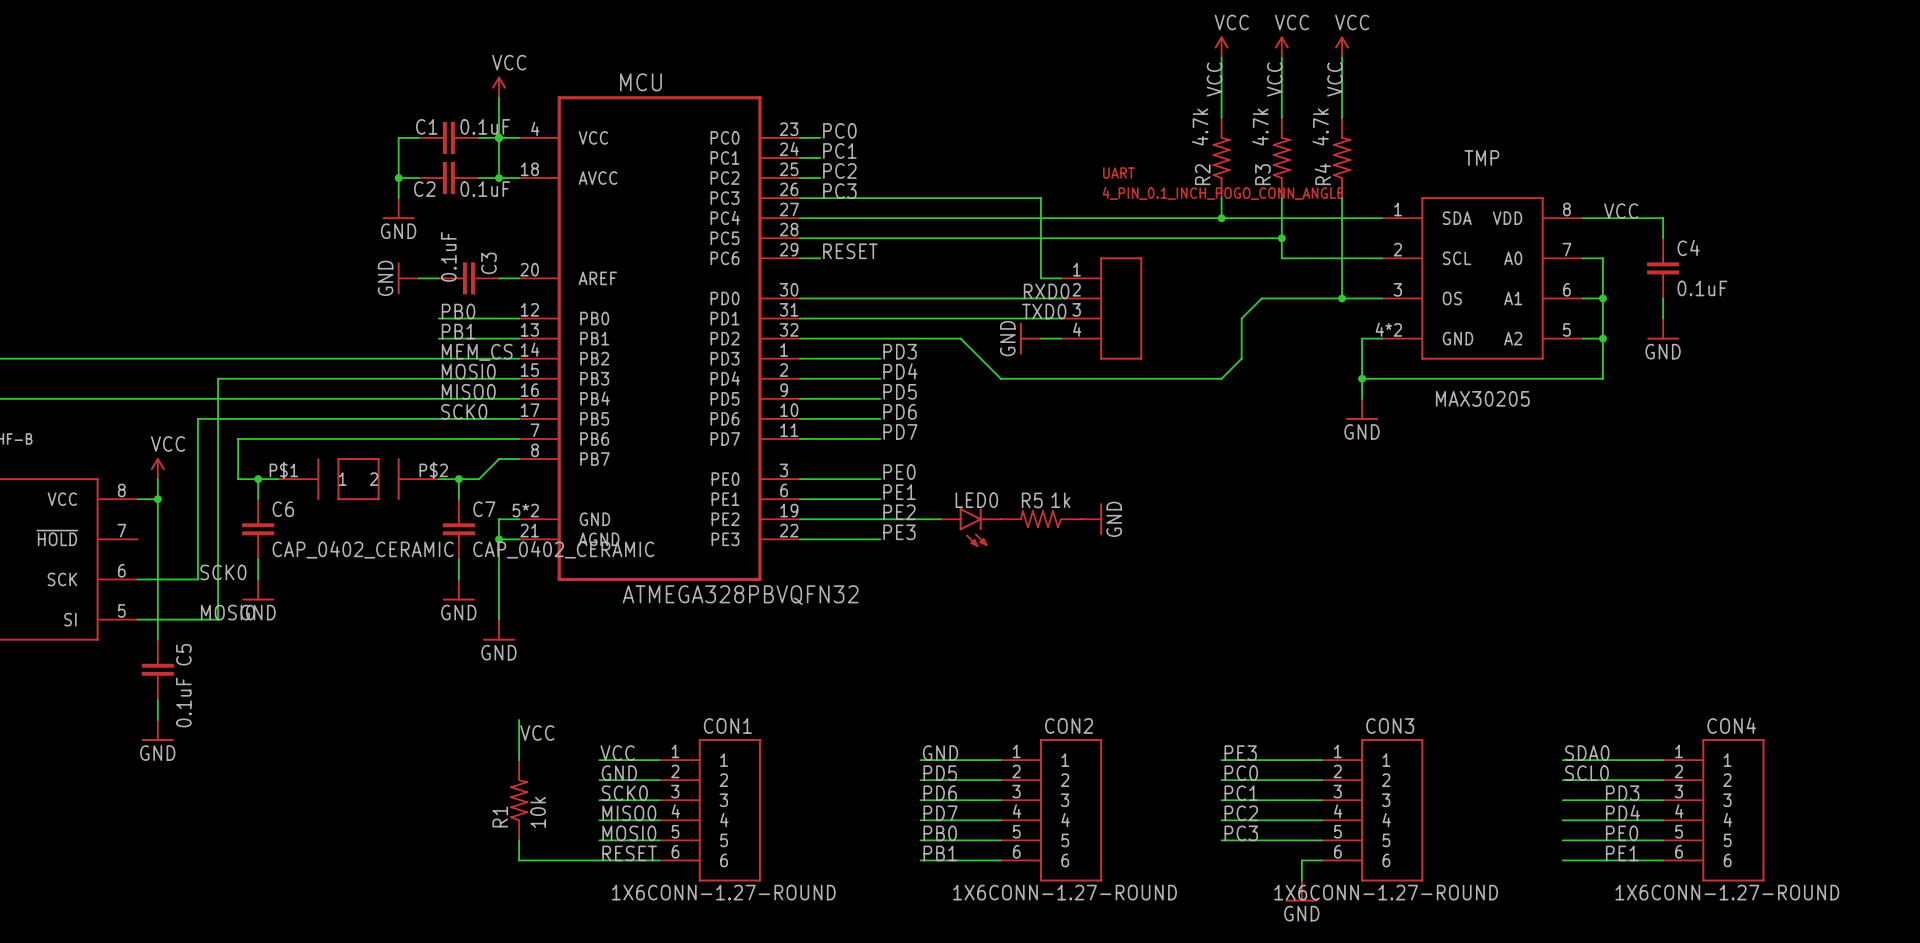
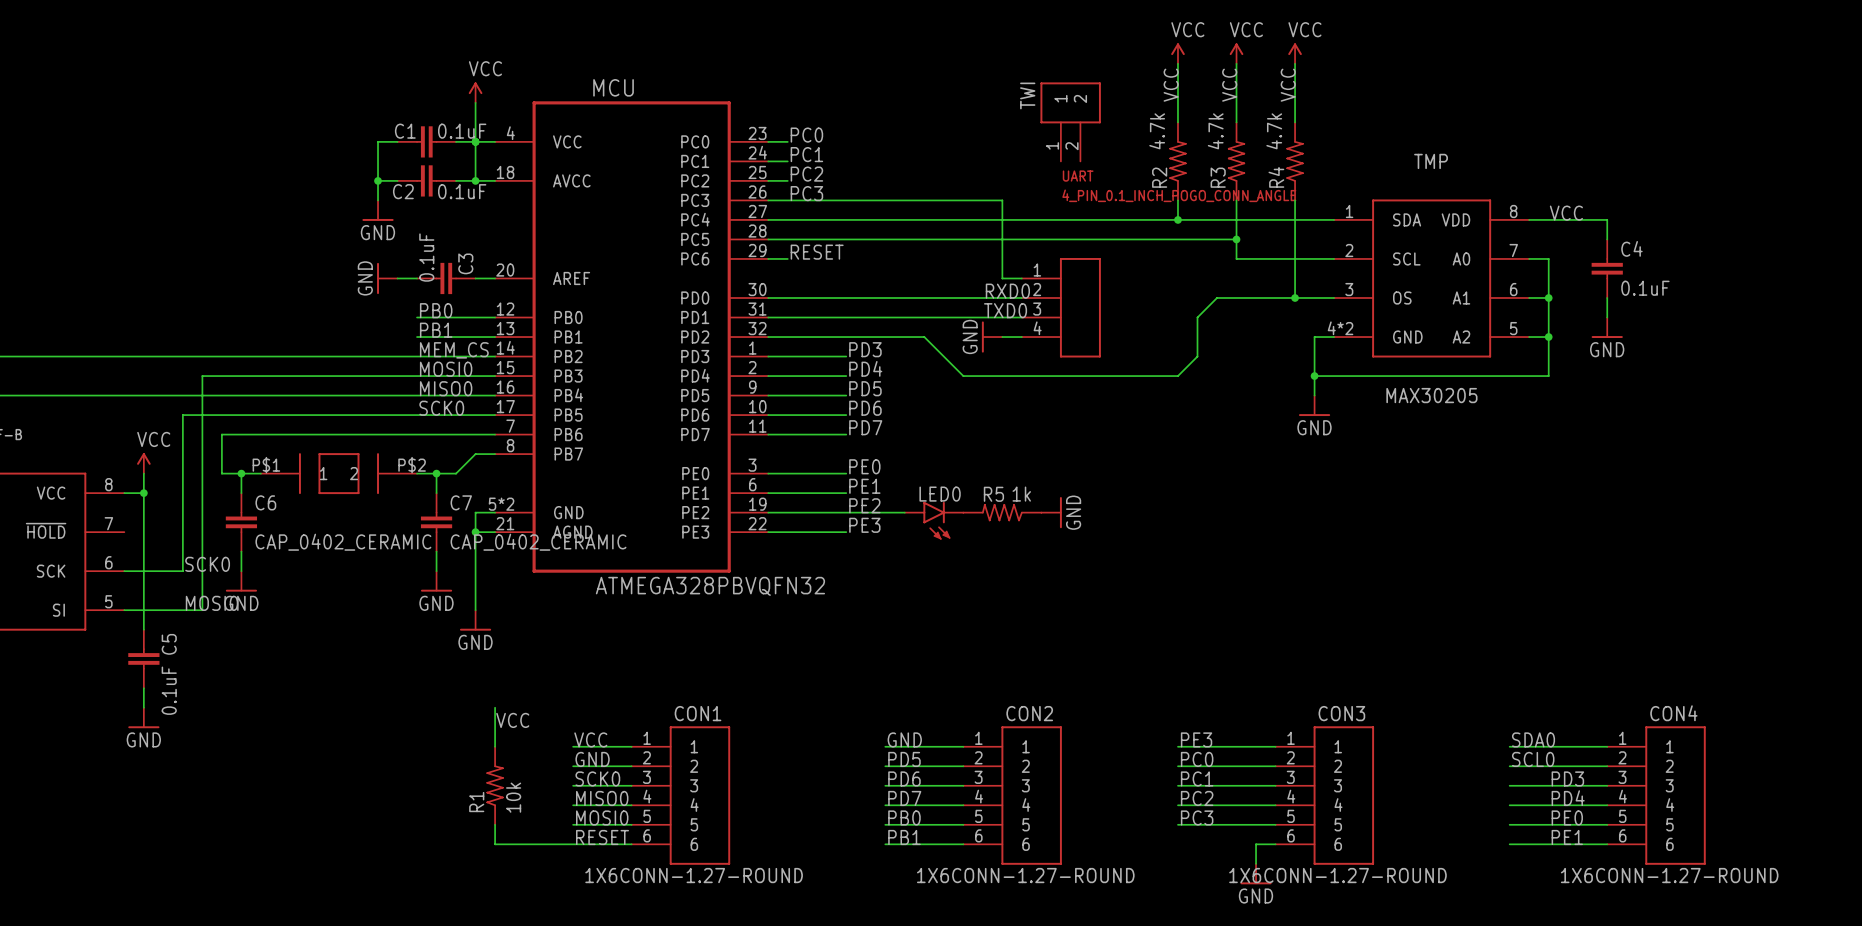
TWI: none -> (1070, 121)

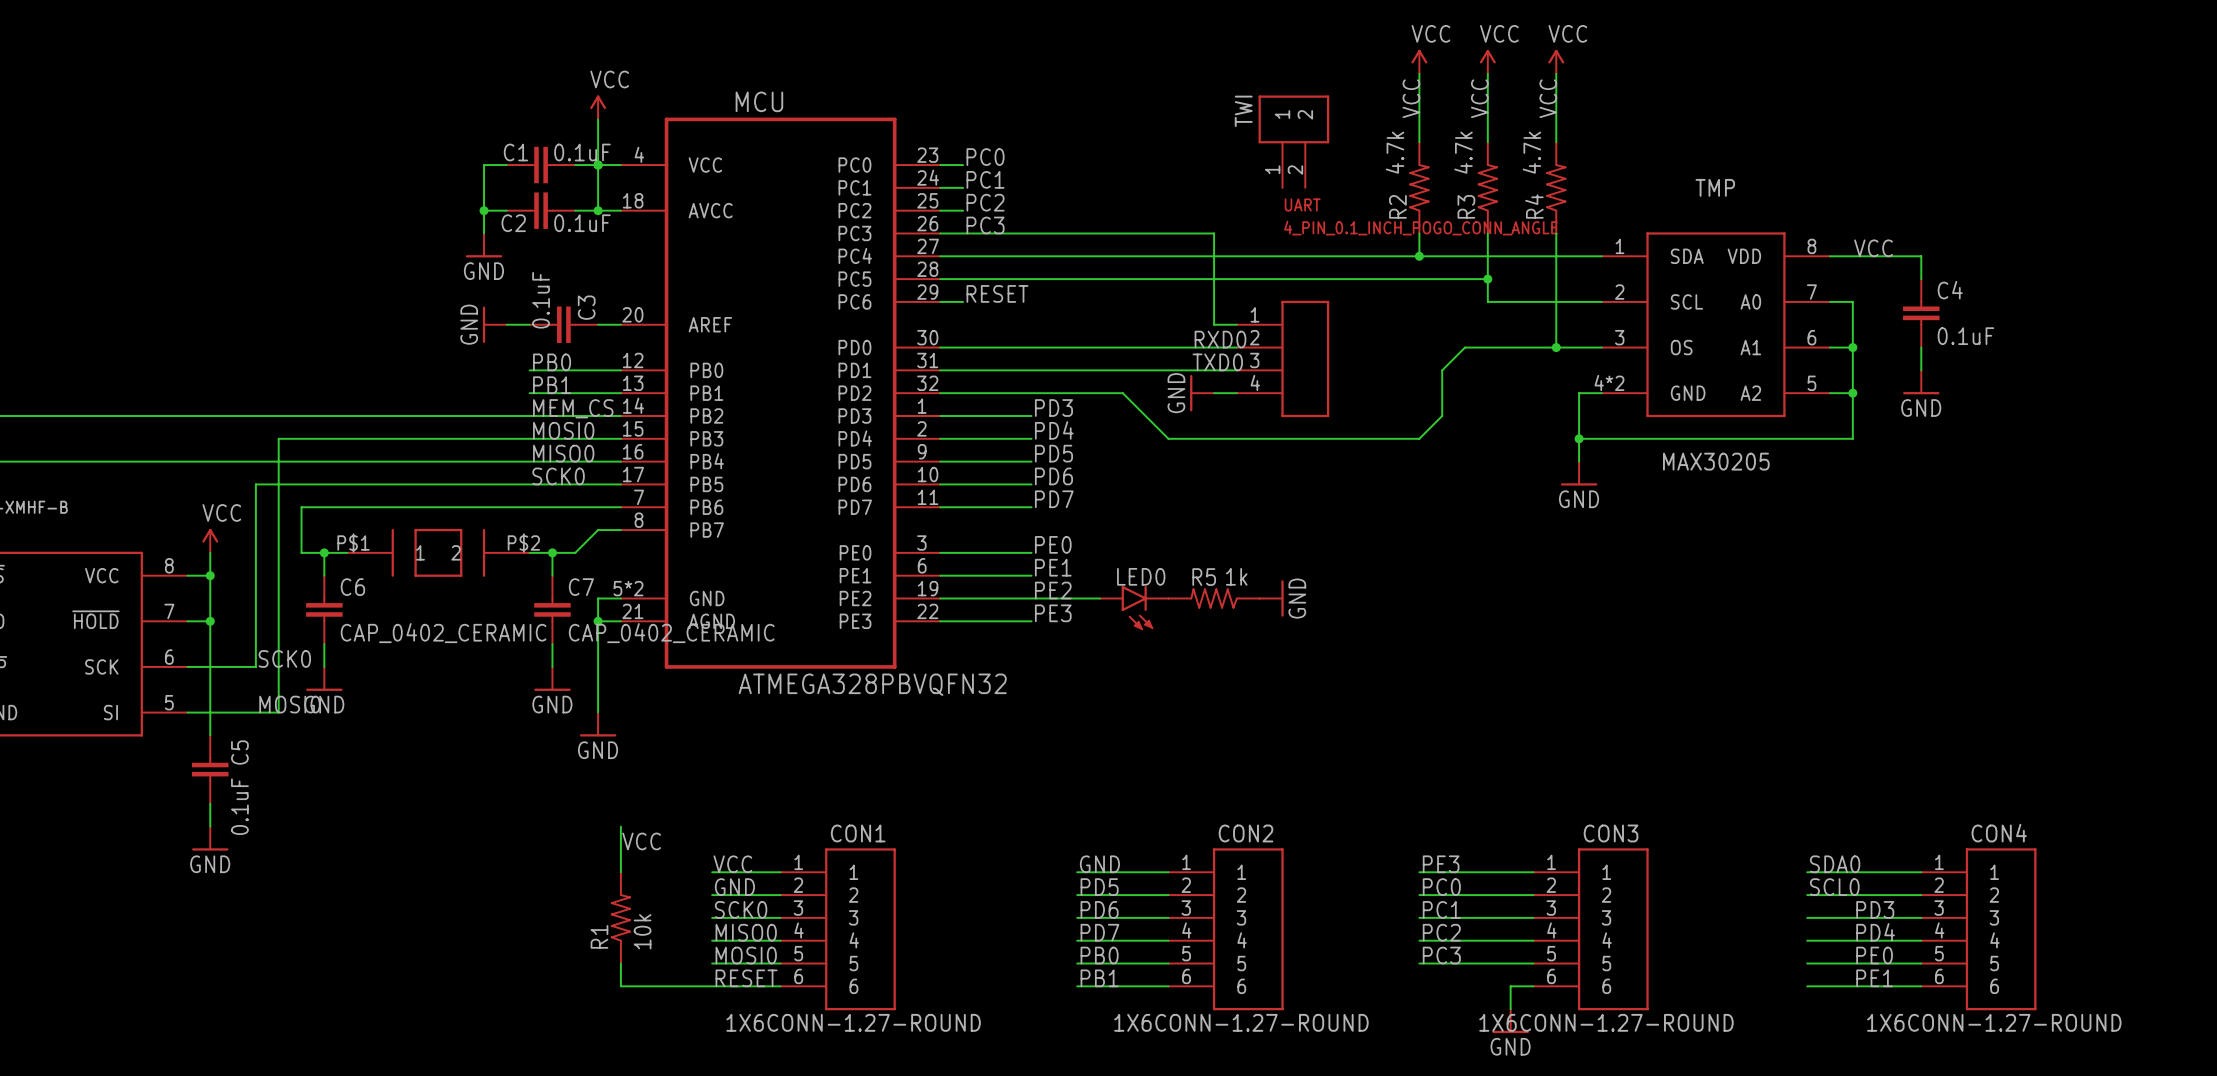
wire: none -> (187, 621) (210, 621)
junction: none -> (210, 621)

